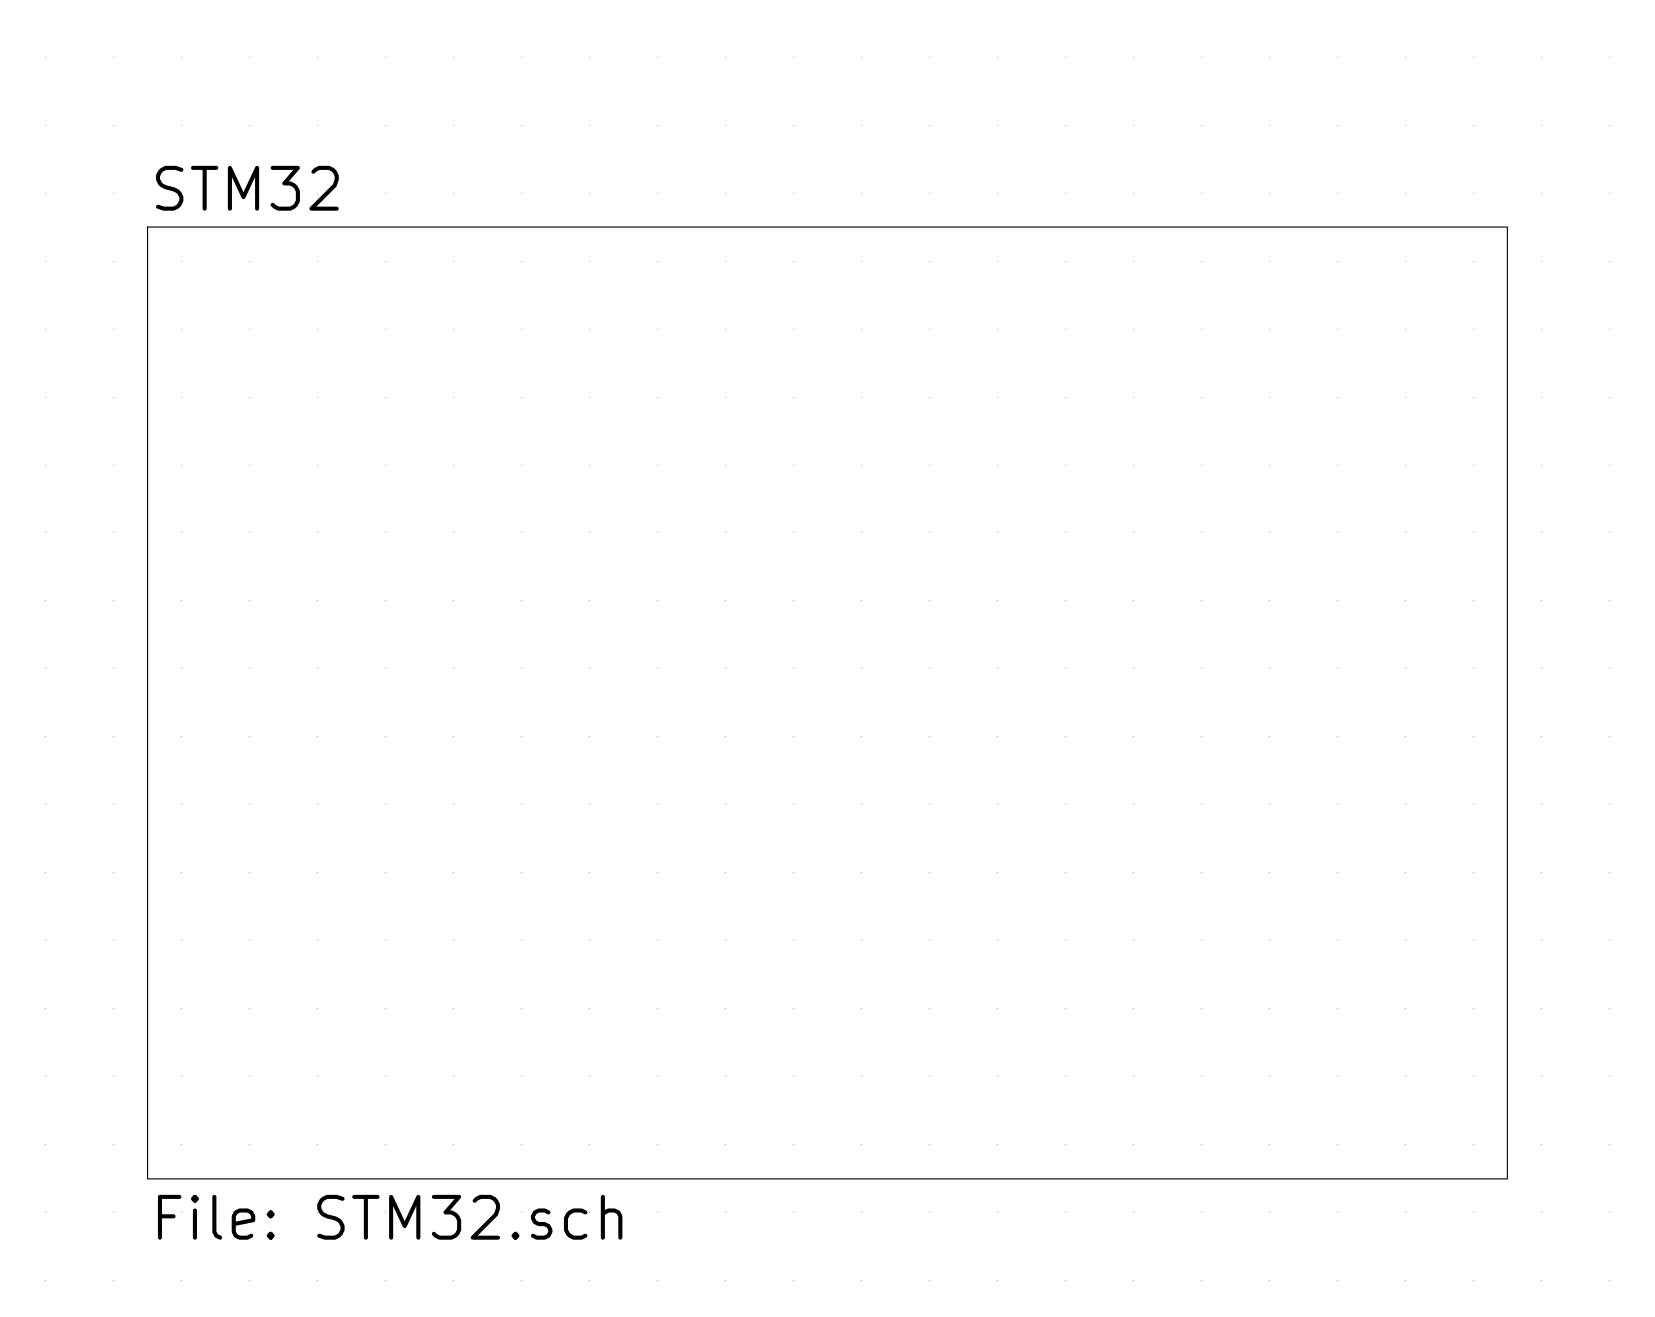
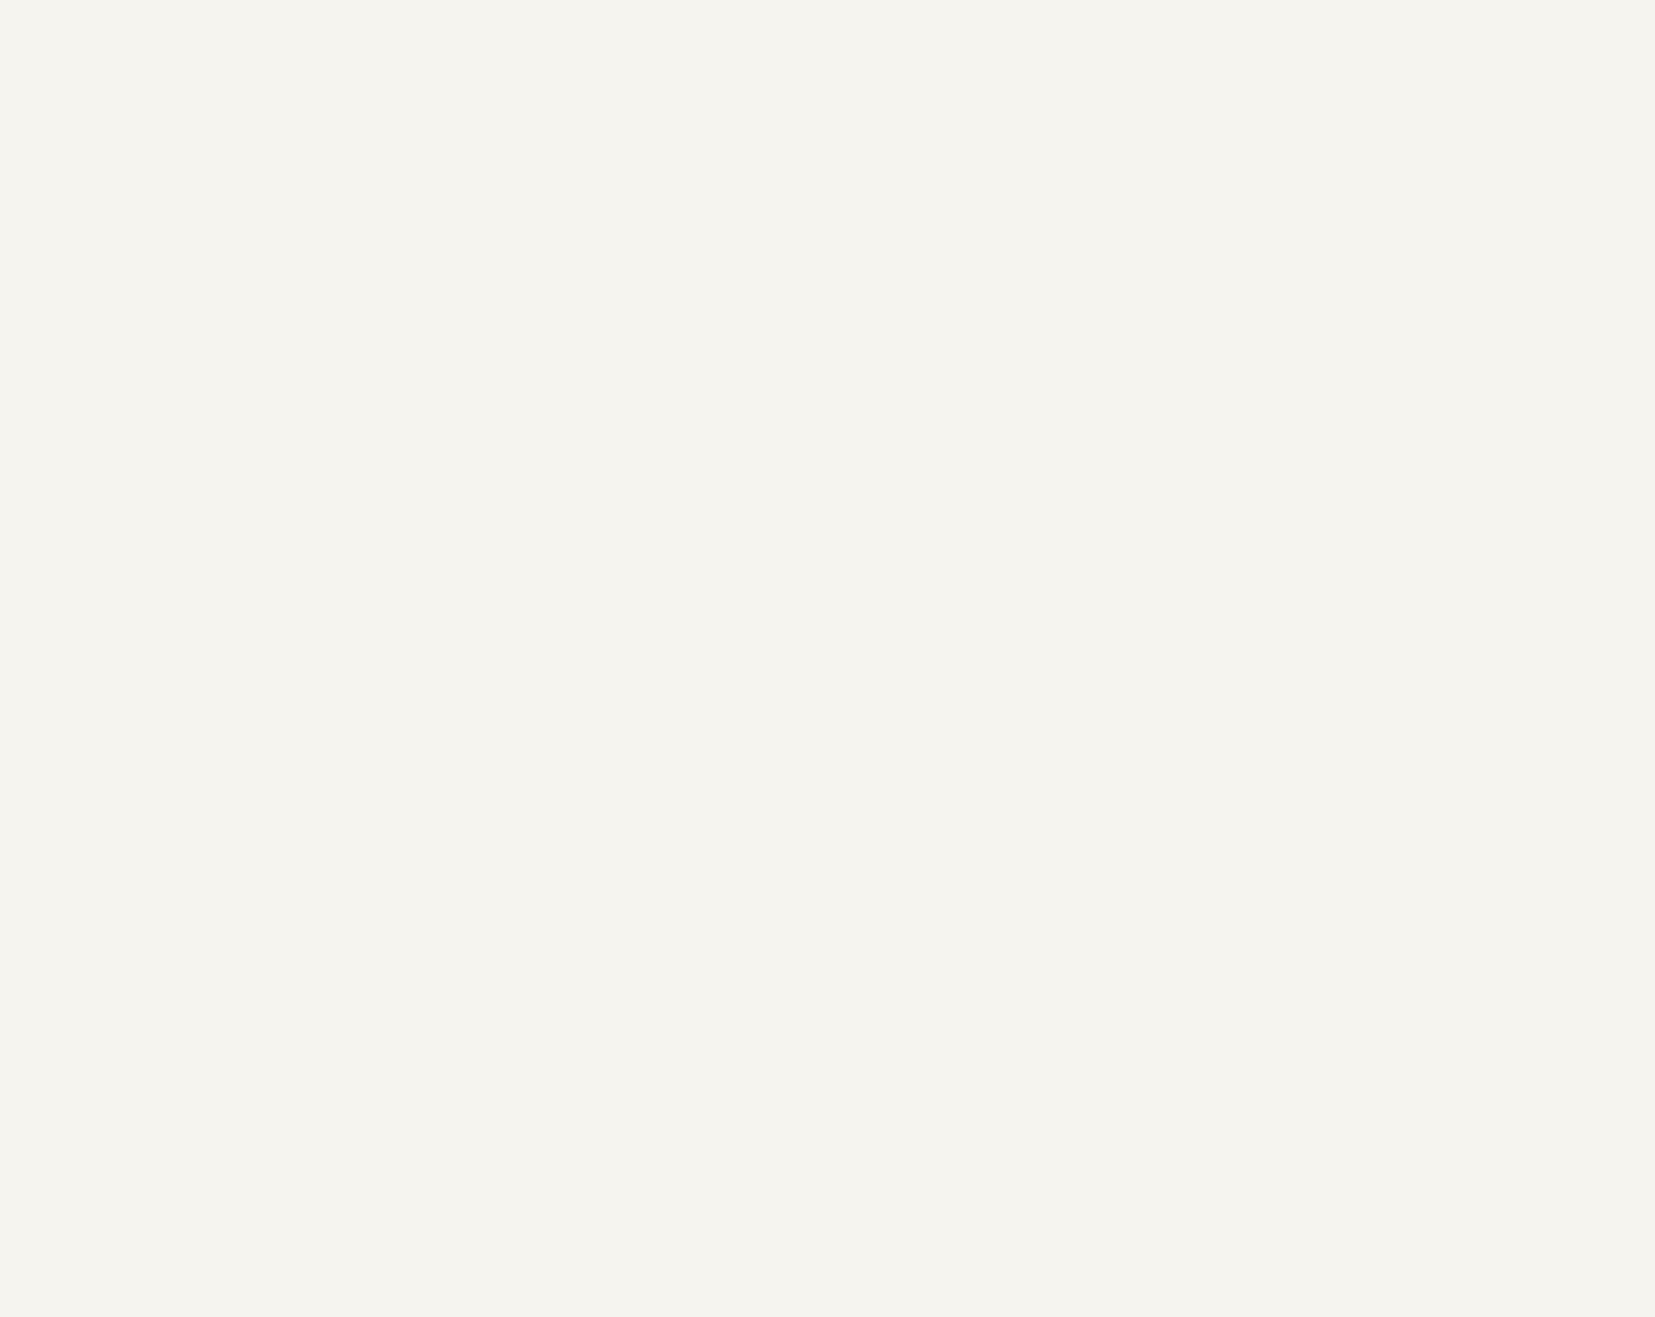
sheet STM32: File: STM32.sch (827, 702) -> none

